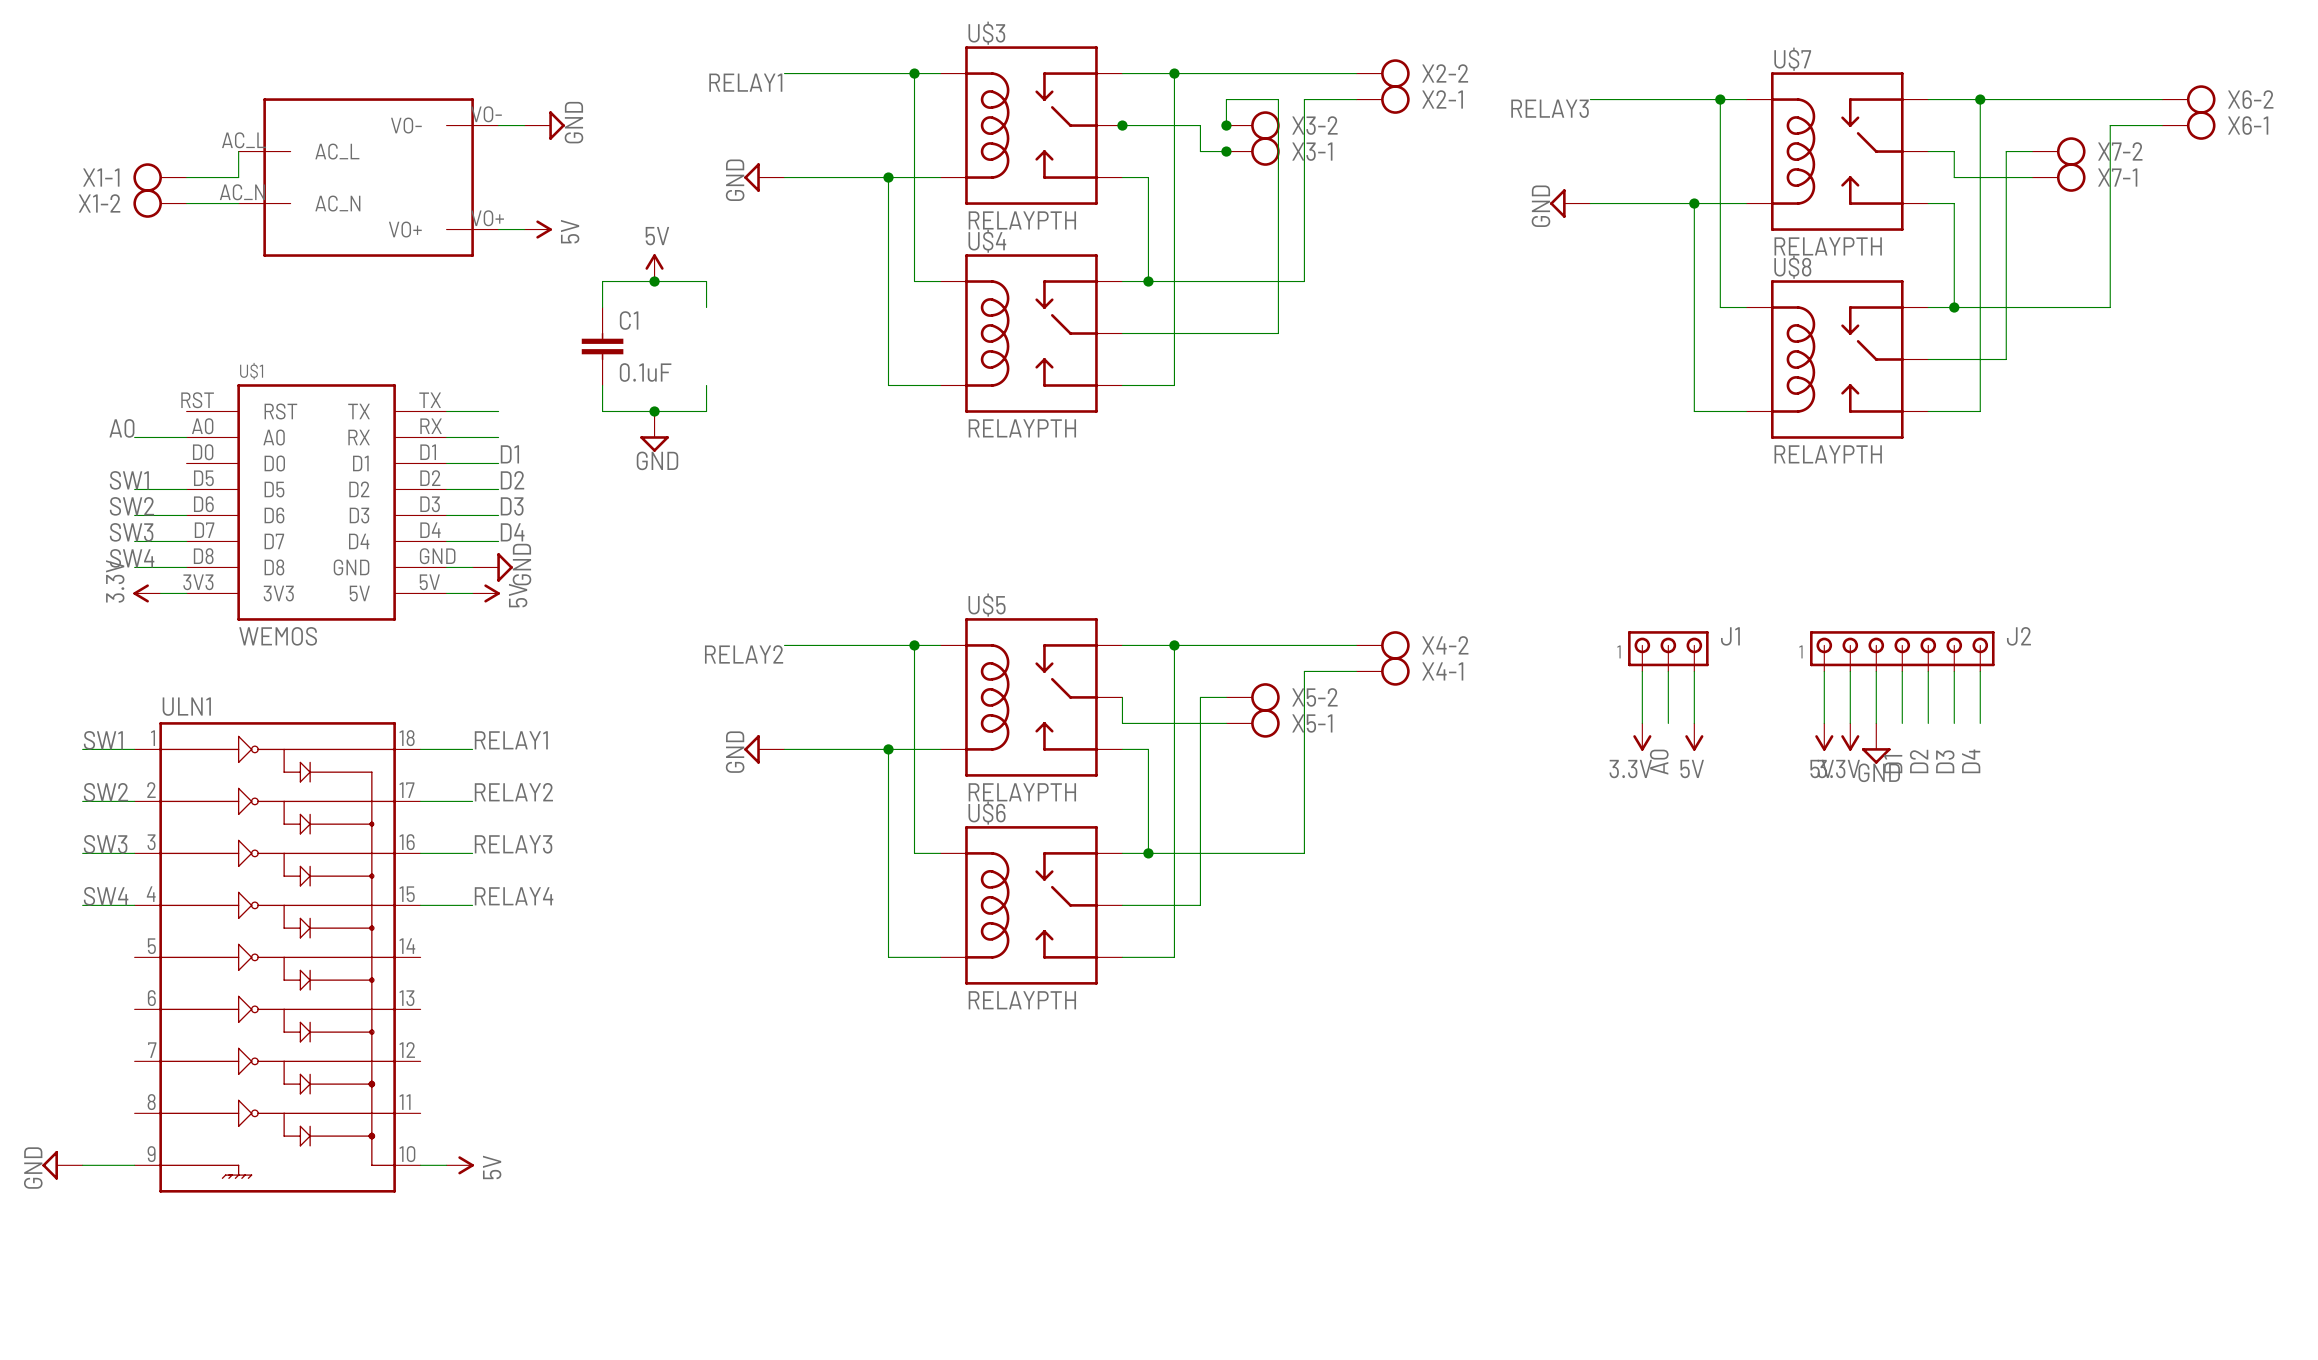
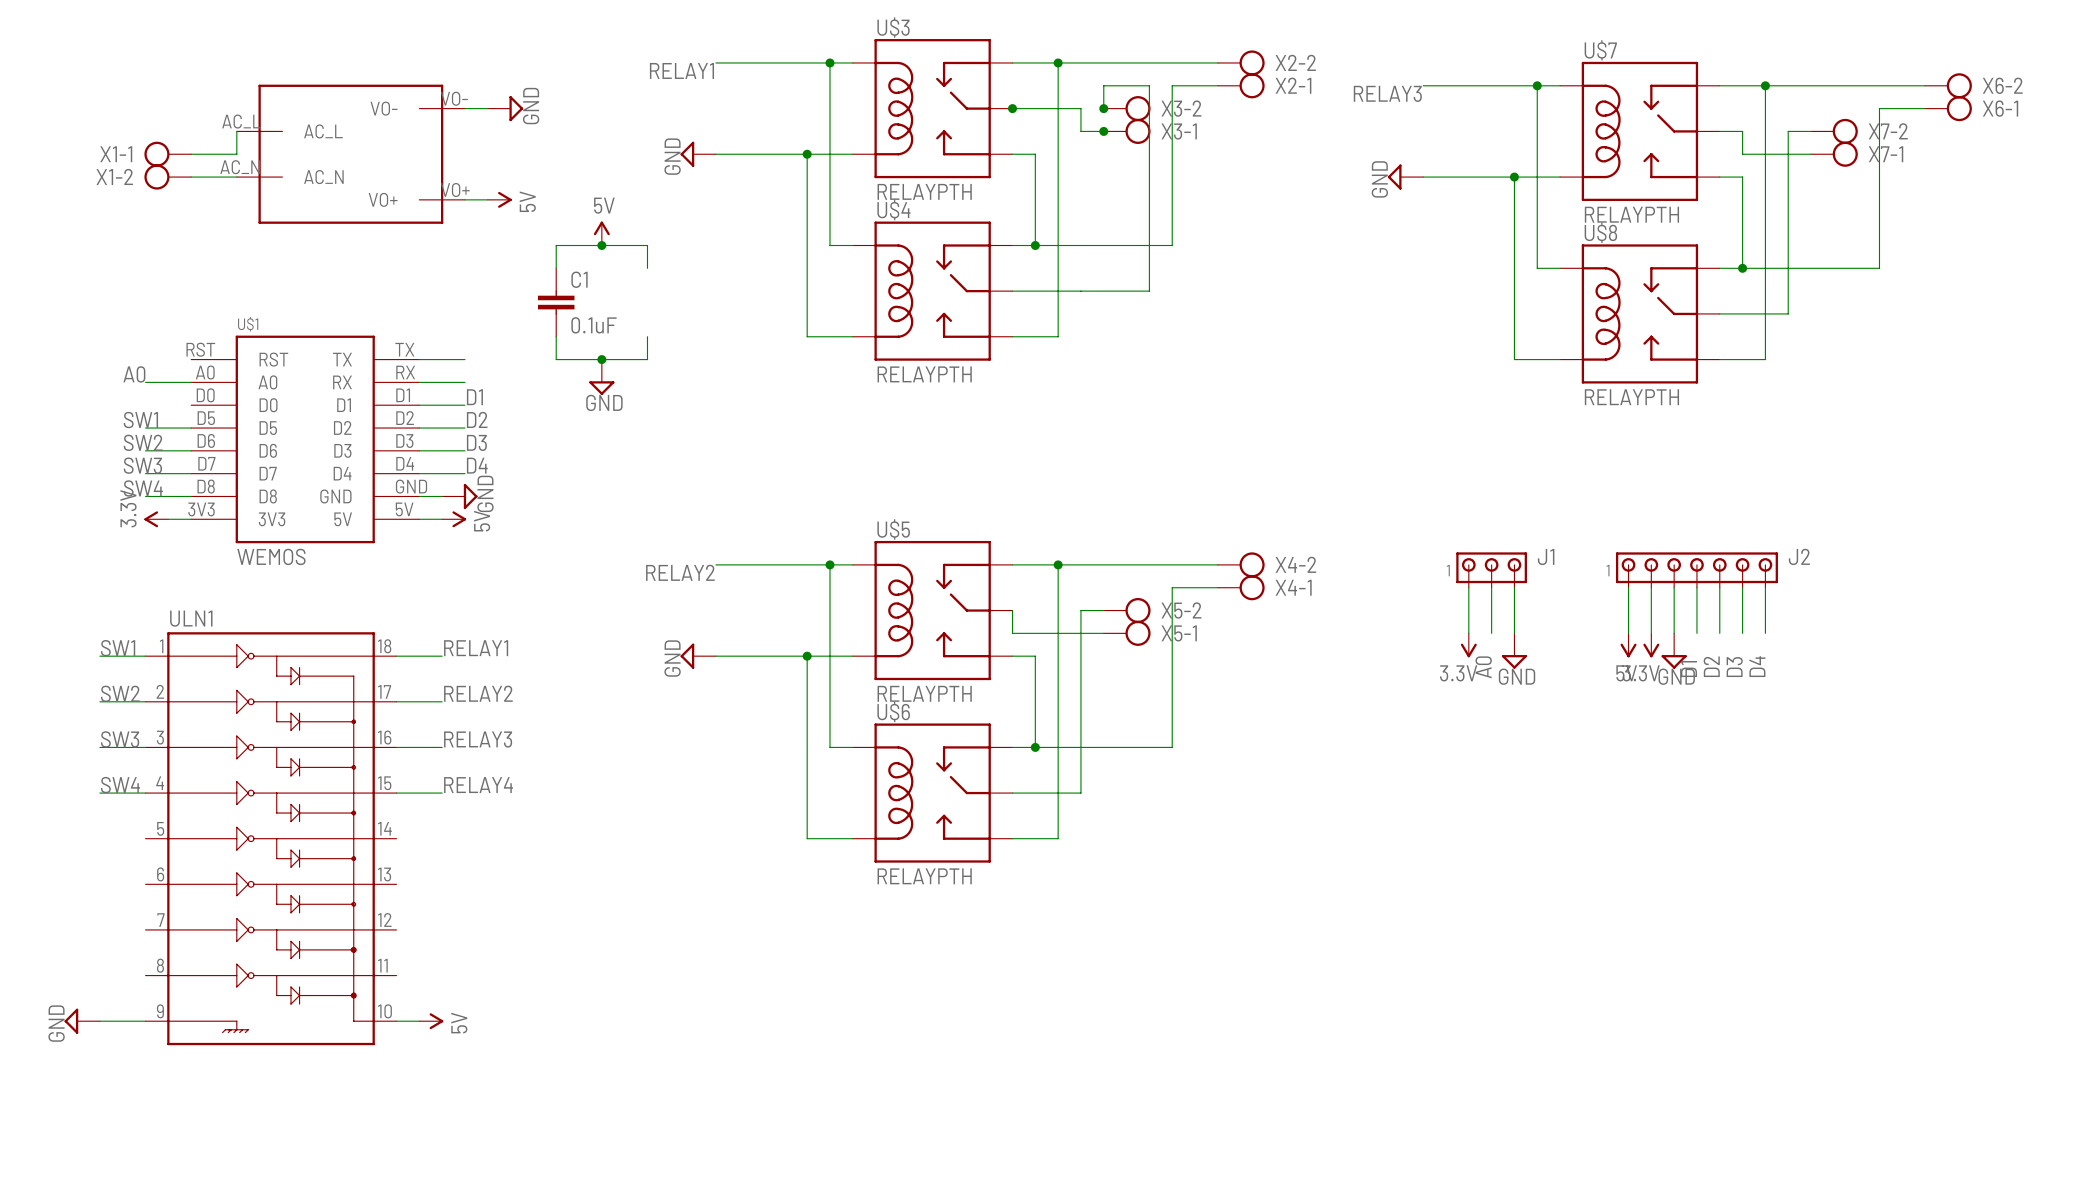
power symbol: 5V (1694, 737) -> GND (1514, 651)

